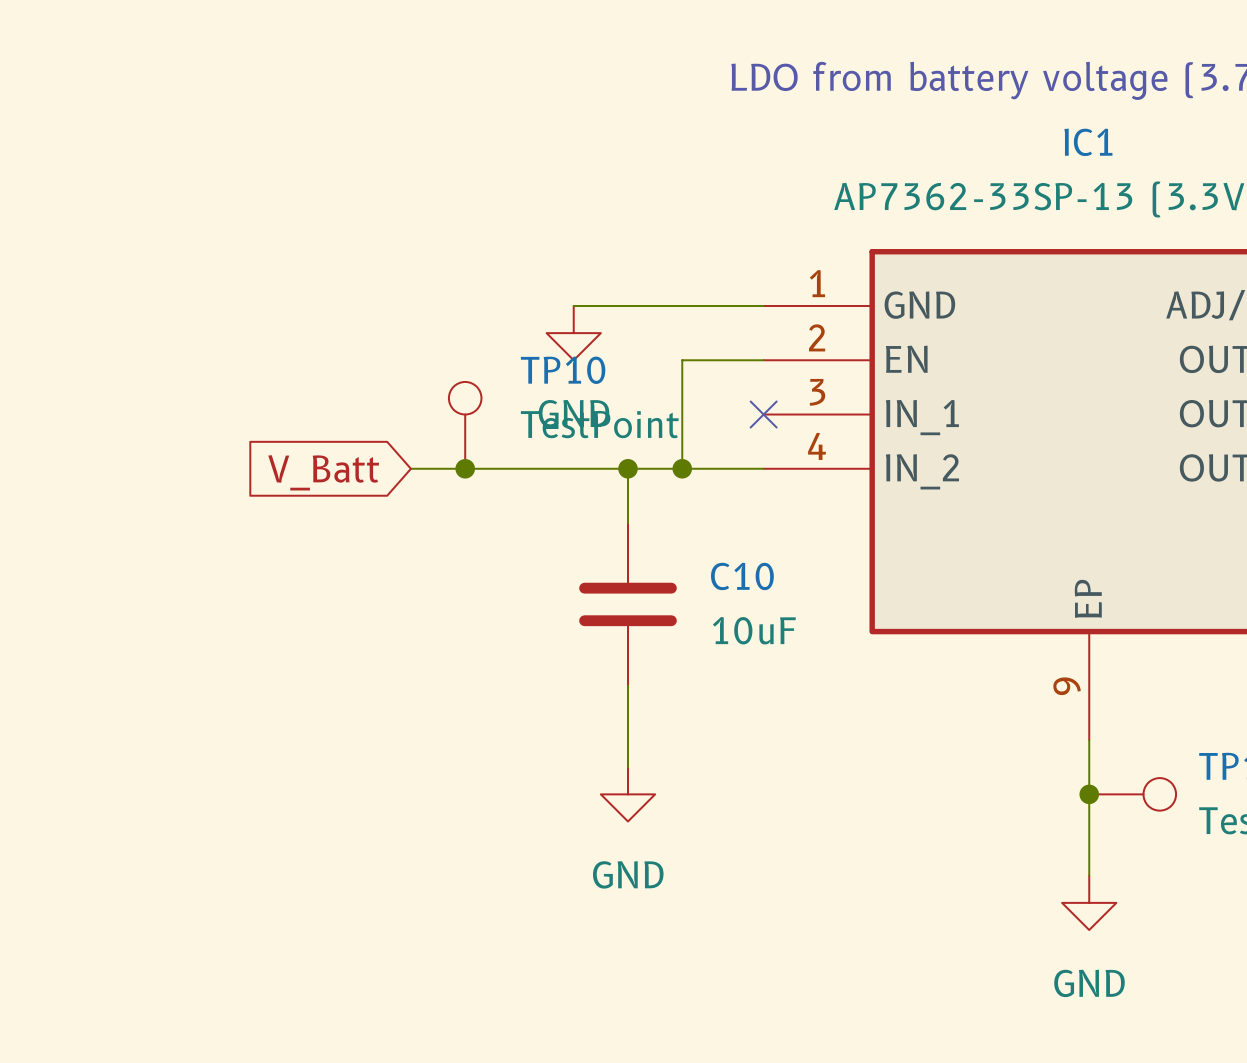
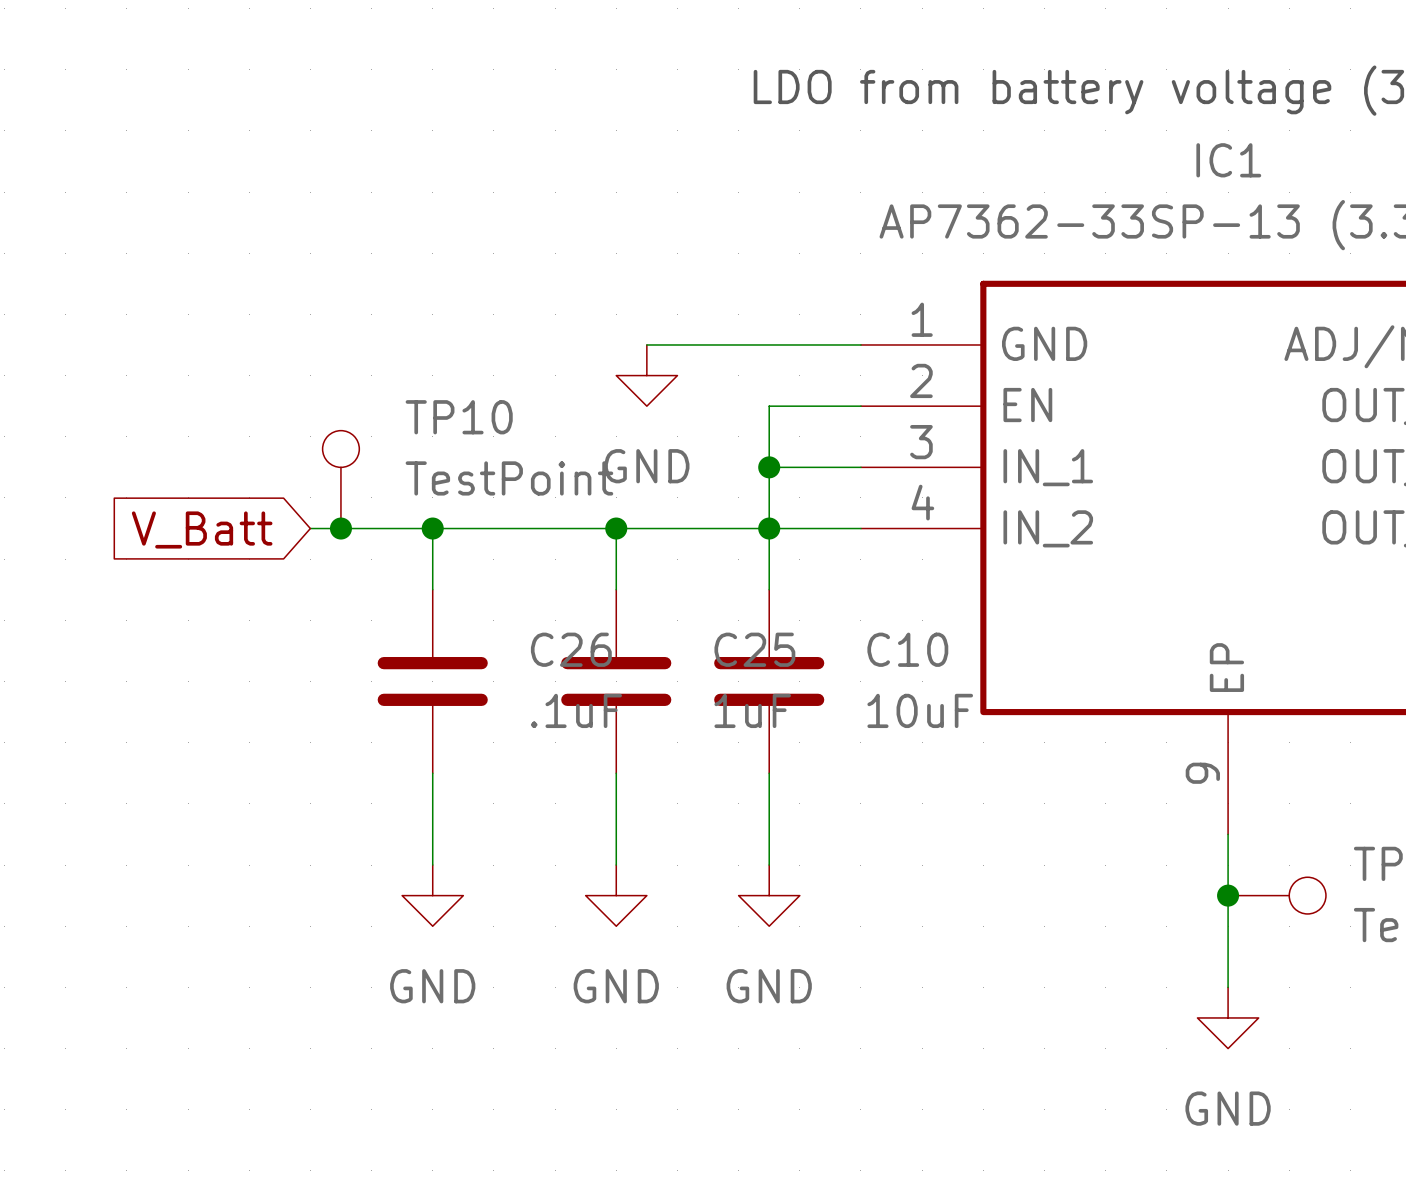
wire: none -> (769, 467) (860, 467)
junction: none -> (769, 467)
no-connect mark: (763, 414) -> none
TP10 position: (465, 425) -> (340, 479)
wire: none -> (310, 528) (463, 528)
junction: none -> (340, 528)
wire: none -> (432, 528) (432, 589)
junction: none -> (432, 528)
junction: (465, 468) -> none
wire: none -> (616, 528) (616, 589)
junction: none -> (616, 528)
wire: (627, 468) (627, 523) -> (769, 528) (769, 589)
junction: (627, 468) -> none
global label position: V_Batt (323, 472) -> V_Batt (202, 529)
C26: none -> .1uF (432, 681)
C25: none -> 1uF (616, 681)
C10 position: (627, 604) -> (769, 681)
wire: none -> (432, 773) (432, 865)
wire: none -> (616, 773) (616, 865)
wire: (627, 685) (627, 767) -> (769, 773) (769, 865)
power symbol: none -> GND (432, 895)
power symbol: none -> GND (616, 895)
power symbol: GND (627, 794) -> none
power symbol: none -> GND (769, 895)

